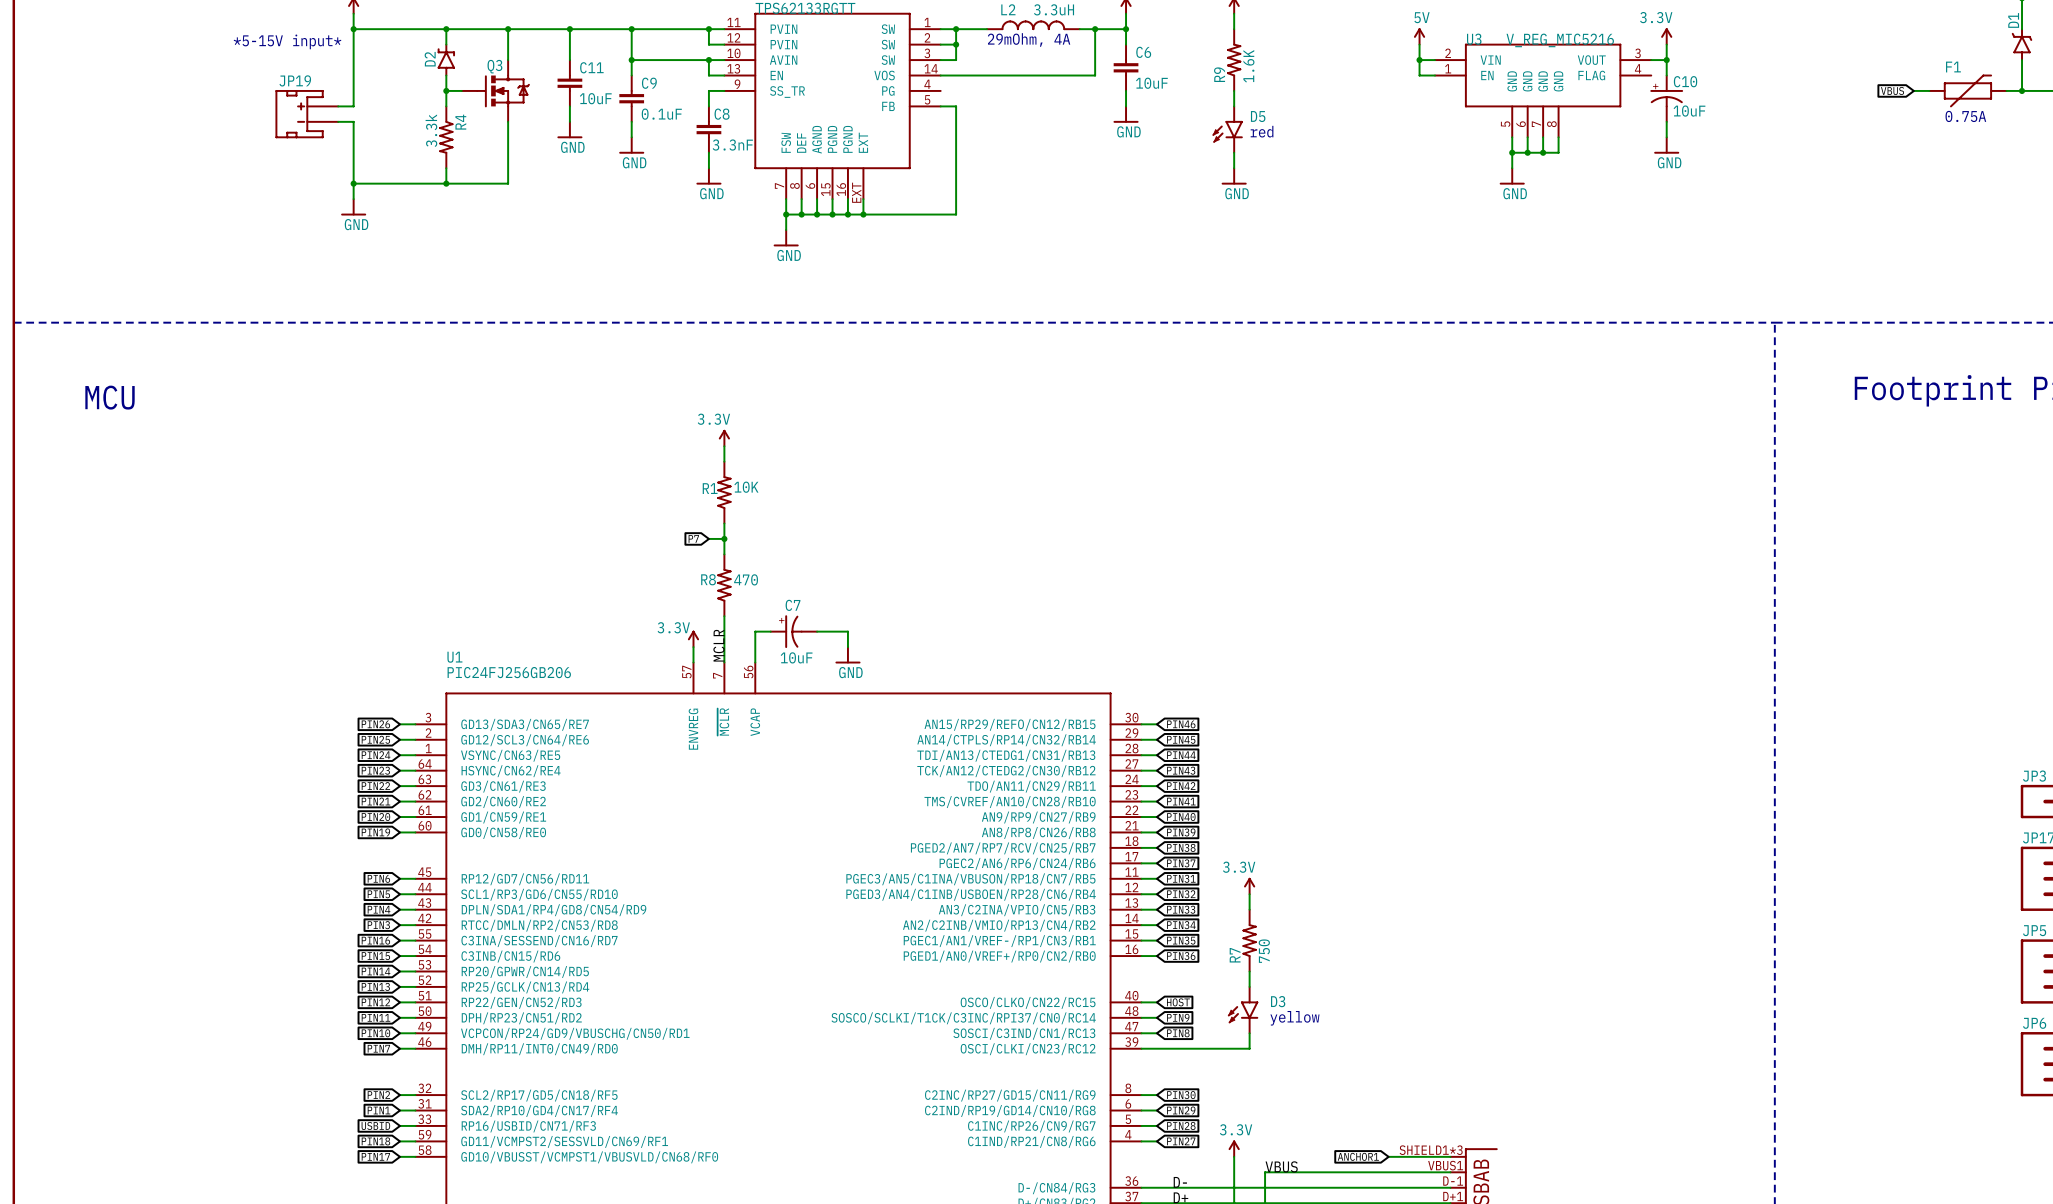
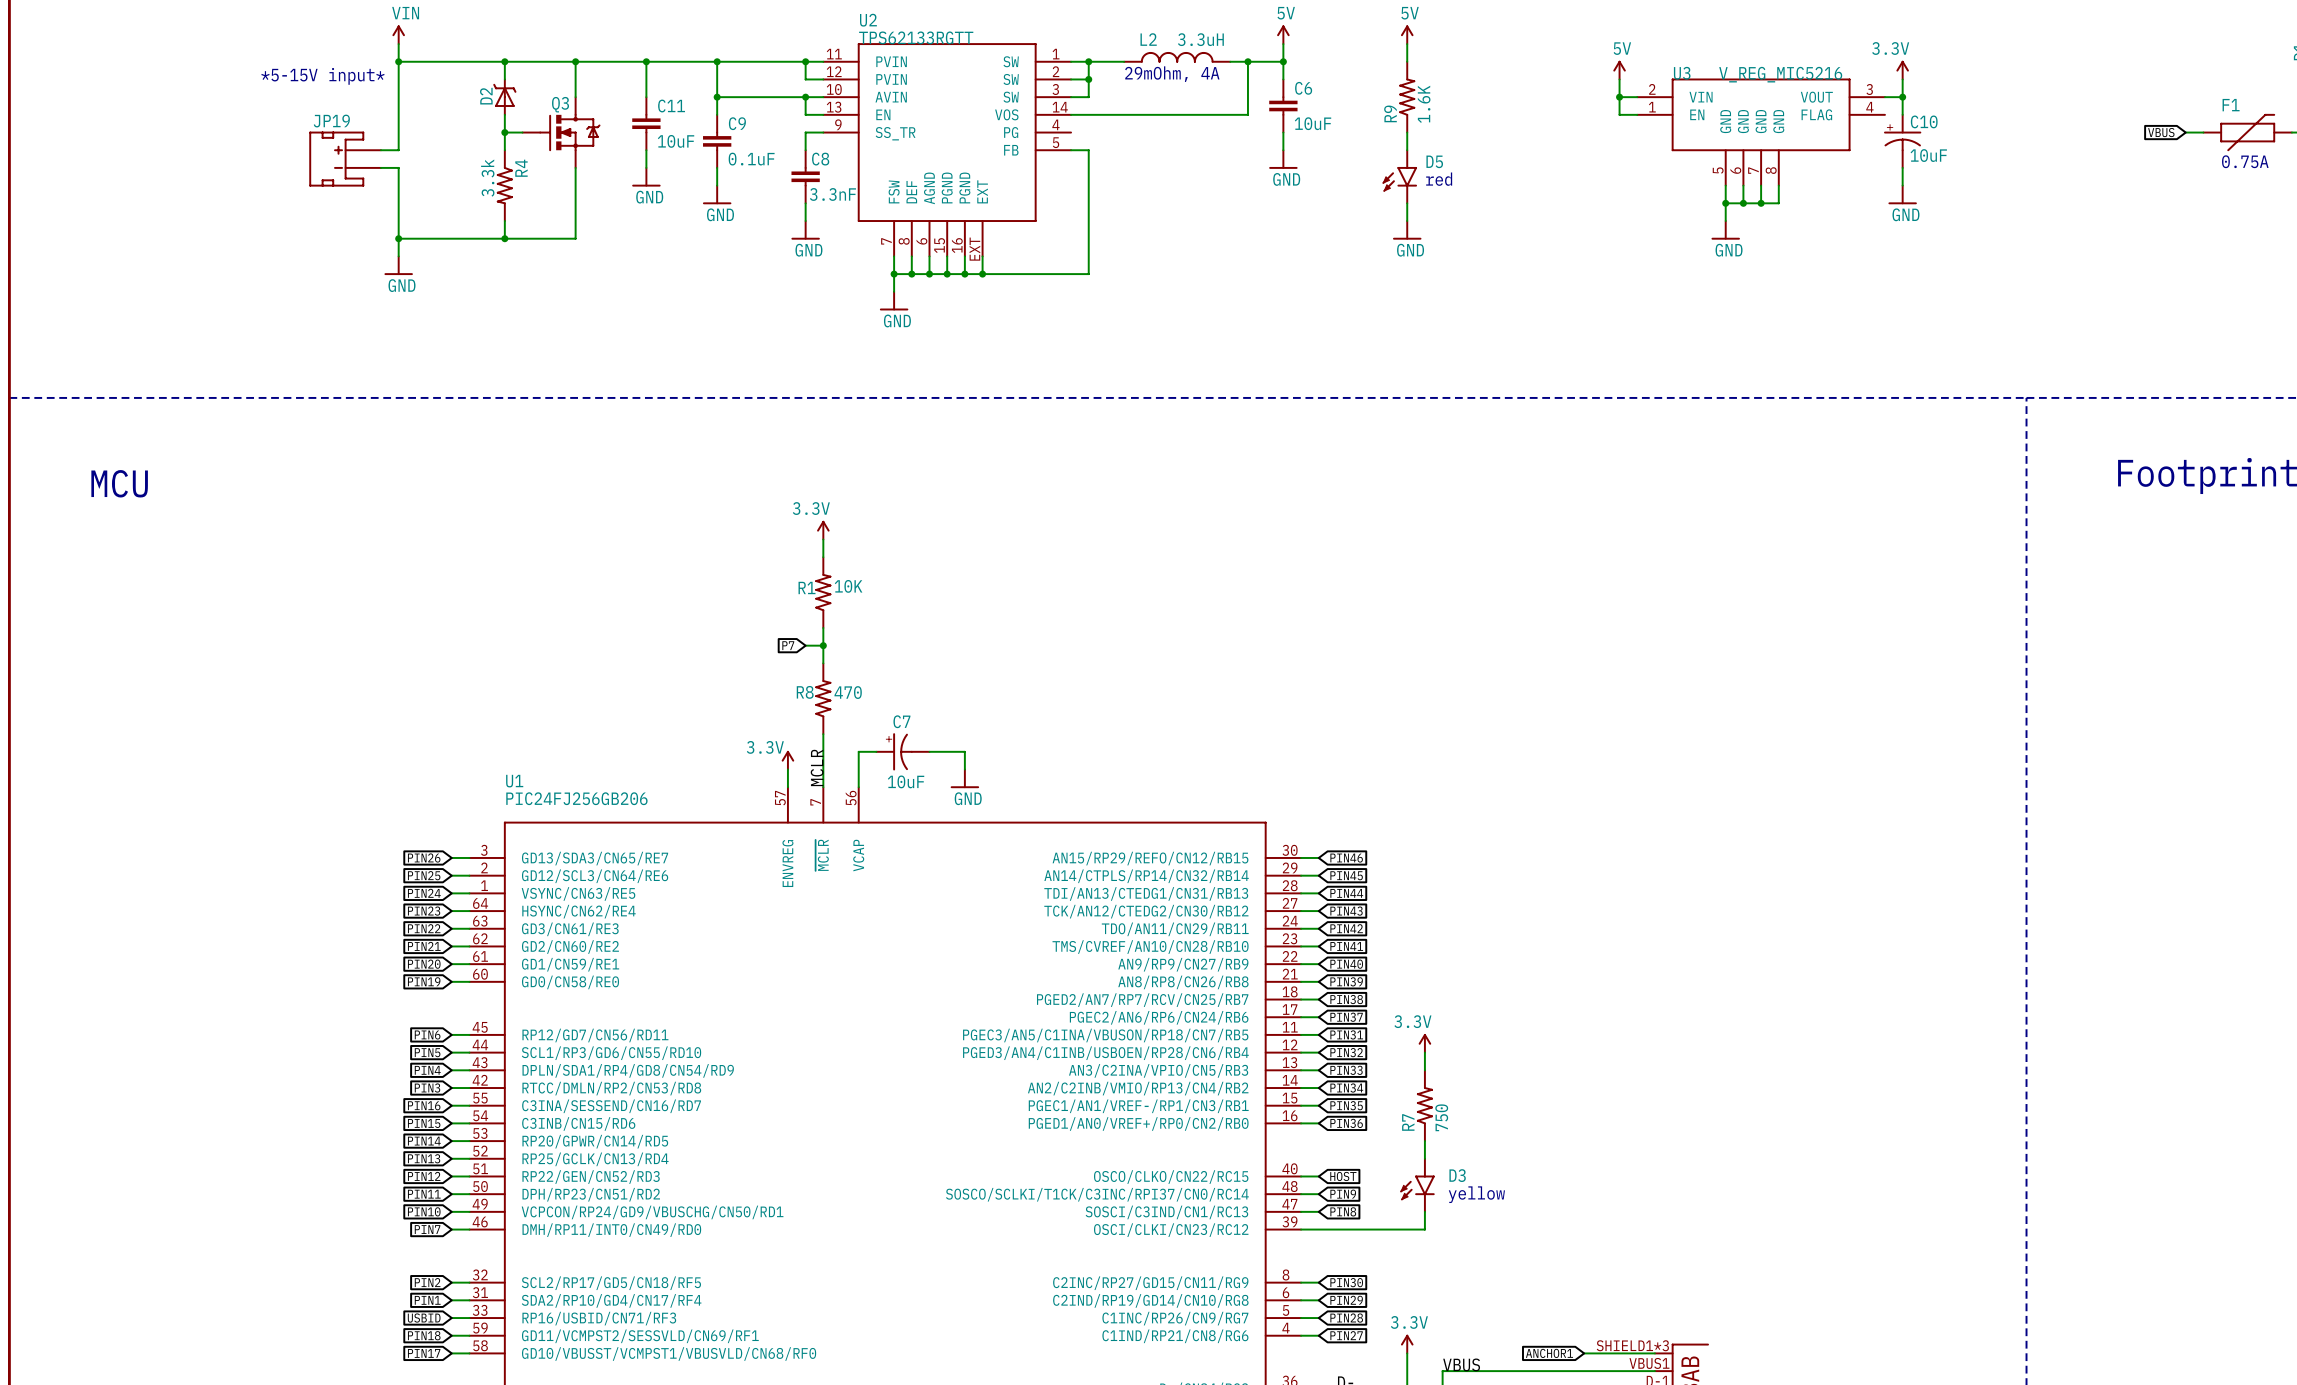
D2 symbol: [437, 44, 455, 76] -> [493, 79, 517, 115]

